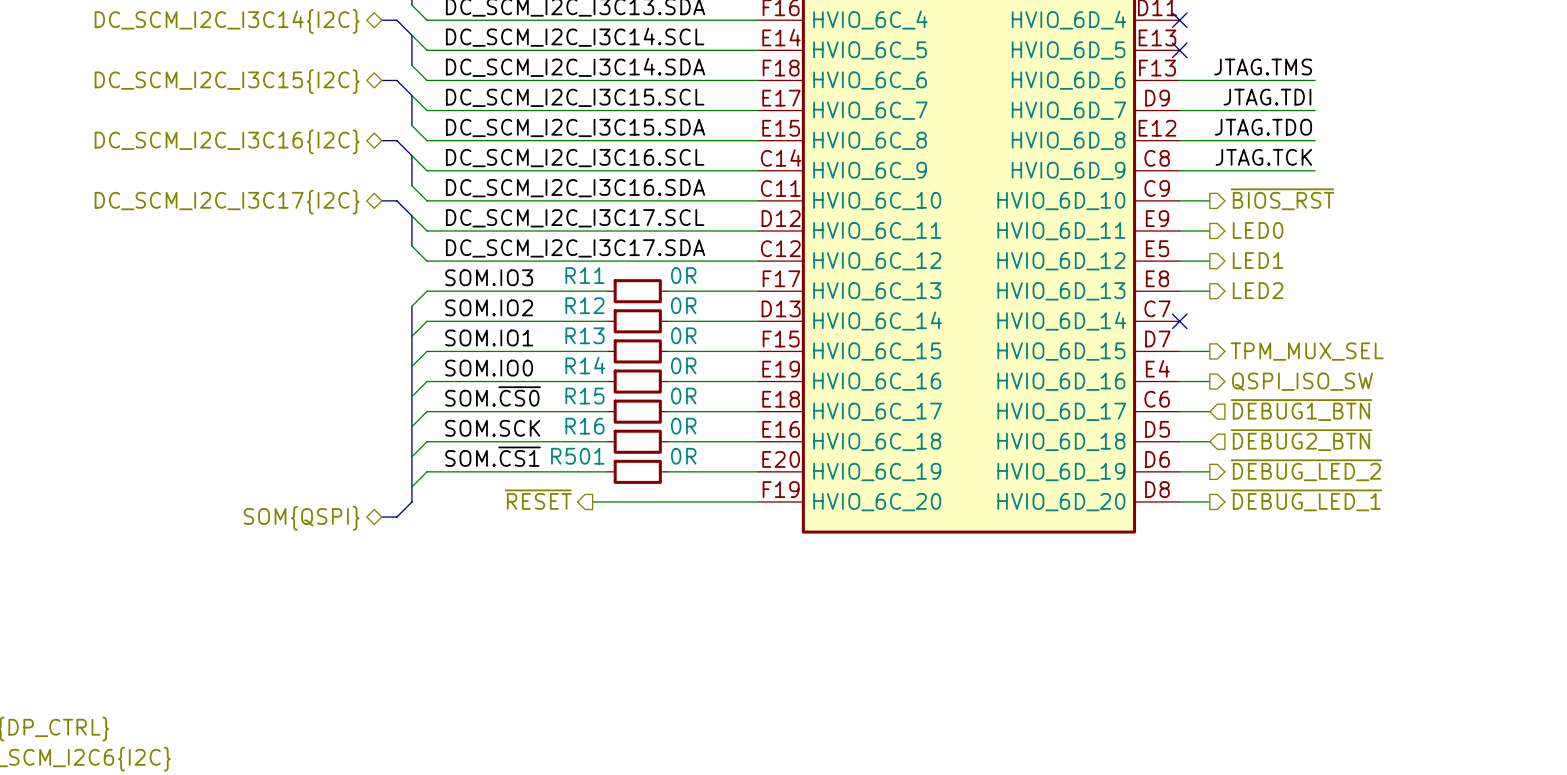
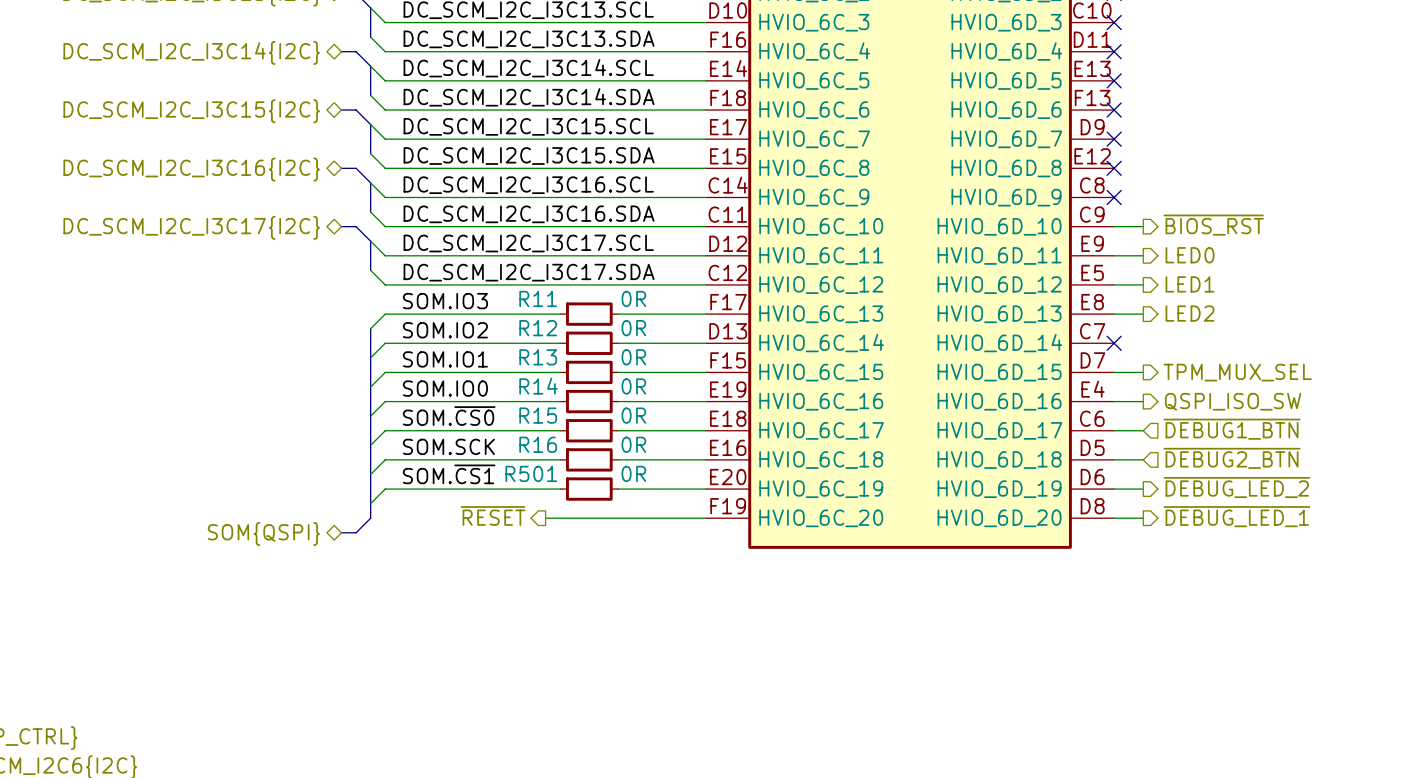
label: JTAG.TMS (1263, 67) -> none
wire: (1179, 80) (1315, 80) -> none
no-connect mark: none -> (1114, 110)
label: JTAG.TDI (1267, 97) -> none
wire: (1179, 110) (1315, 110) -> none
no-connect mark: none -> (1114, 139)
label: JTAG.TDO (1263, 127) -> none
wire: (1179, 140) (1315, 140) -> none
no-connect mark: none -> (1114, 168)
label: JTAG.TCK (1263, 157) -> none
wire: (1179, 170) (1315, 170) -> none
no-connect mark: none -> (1114, 197)

